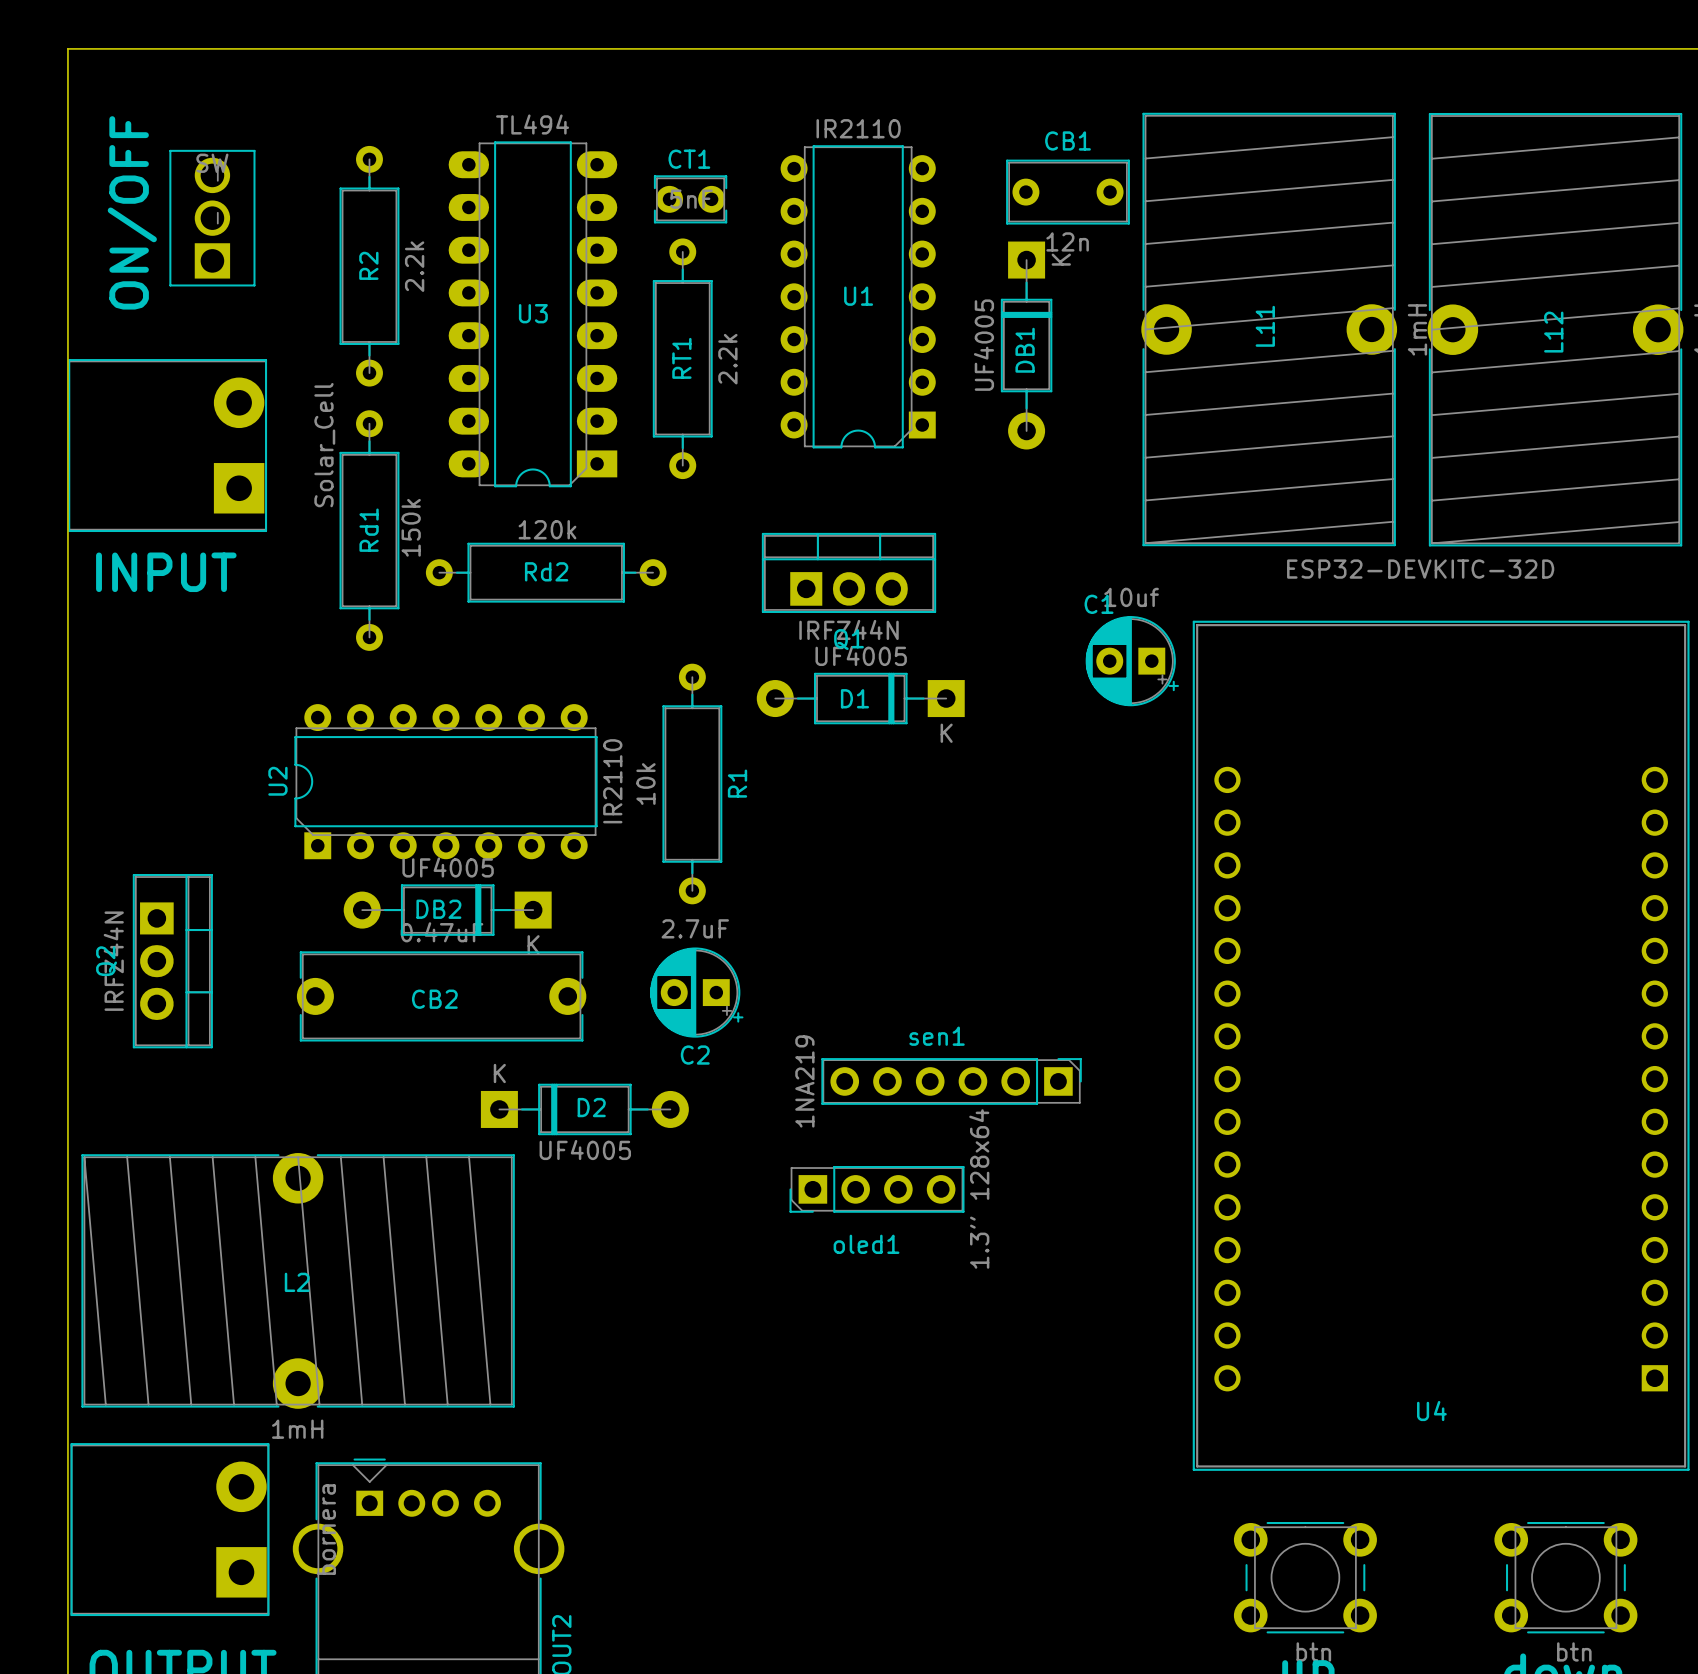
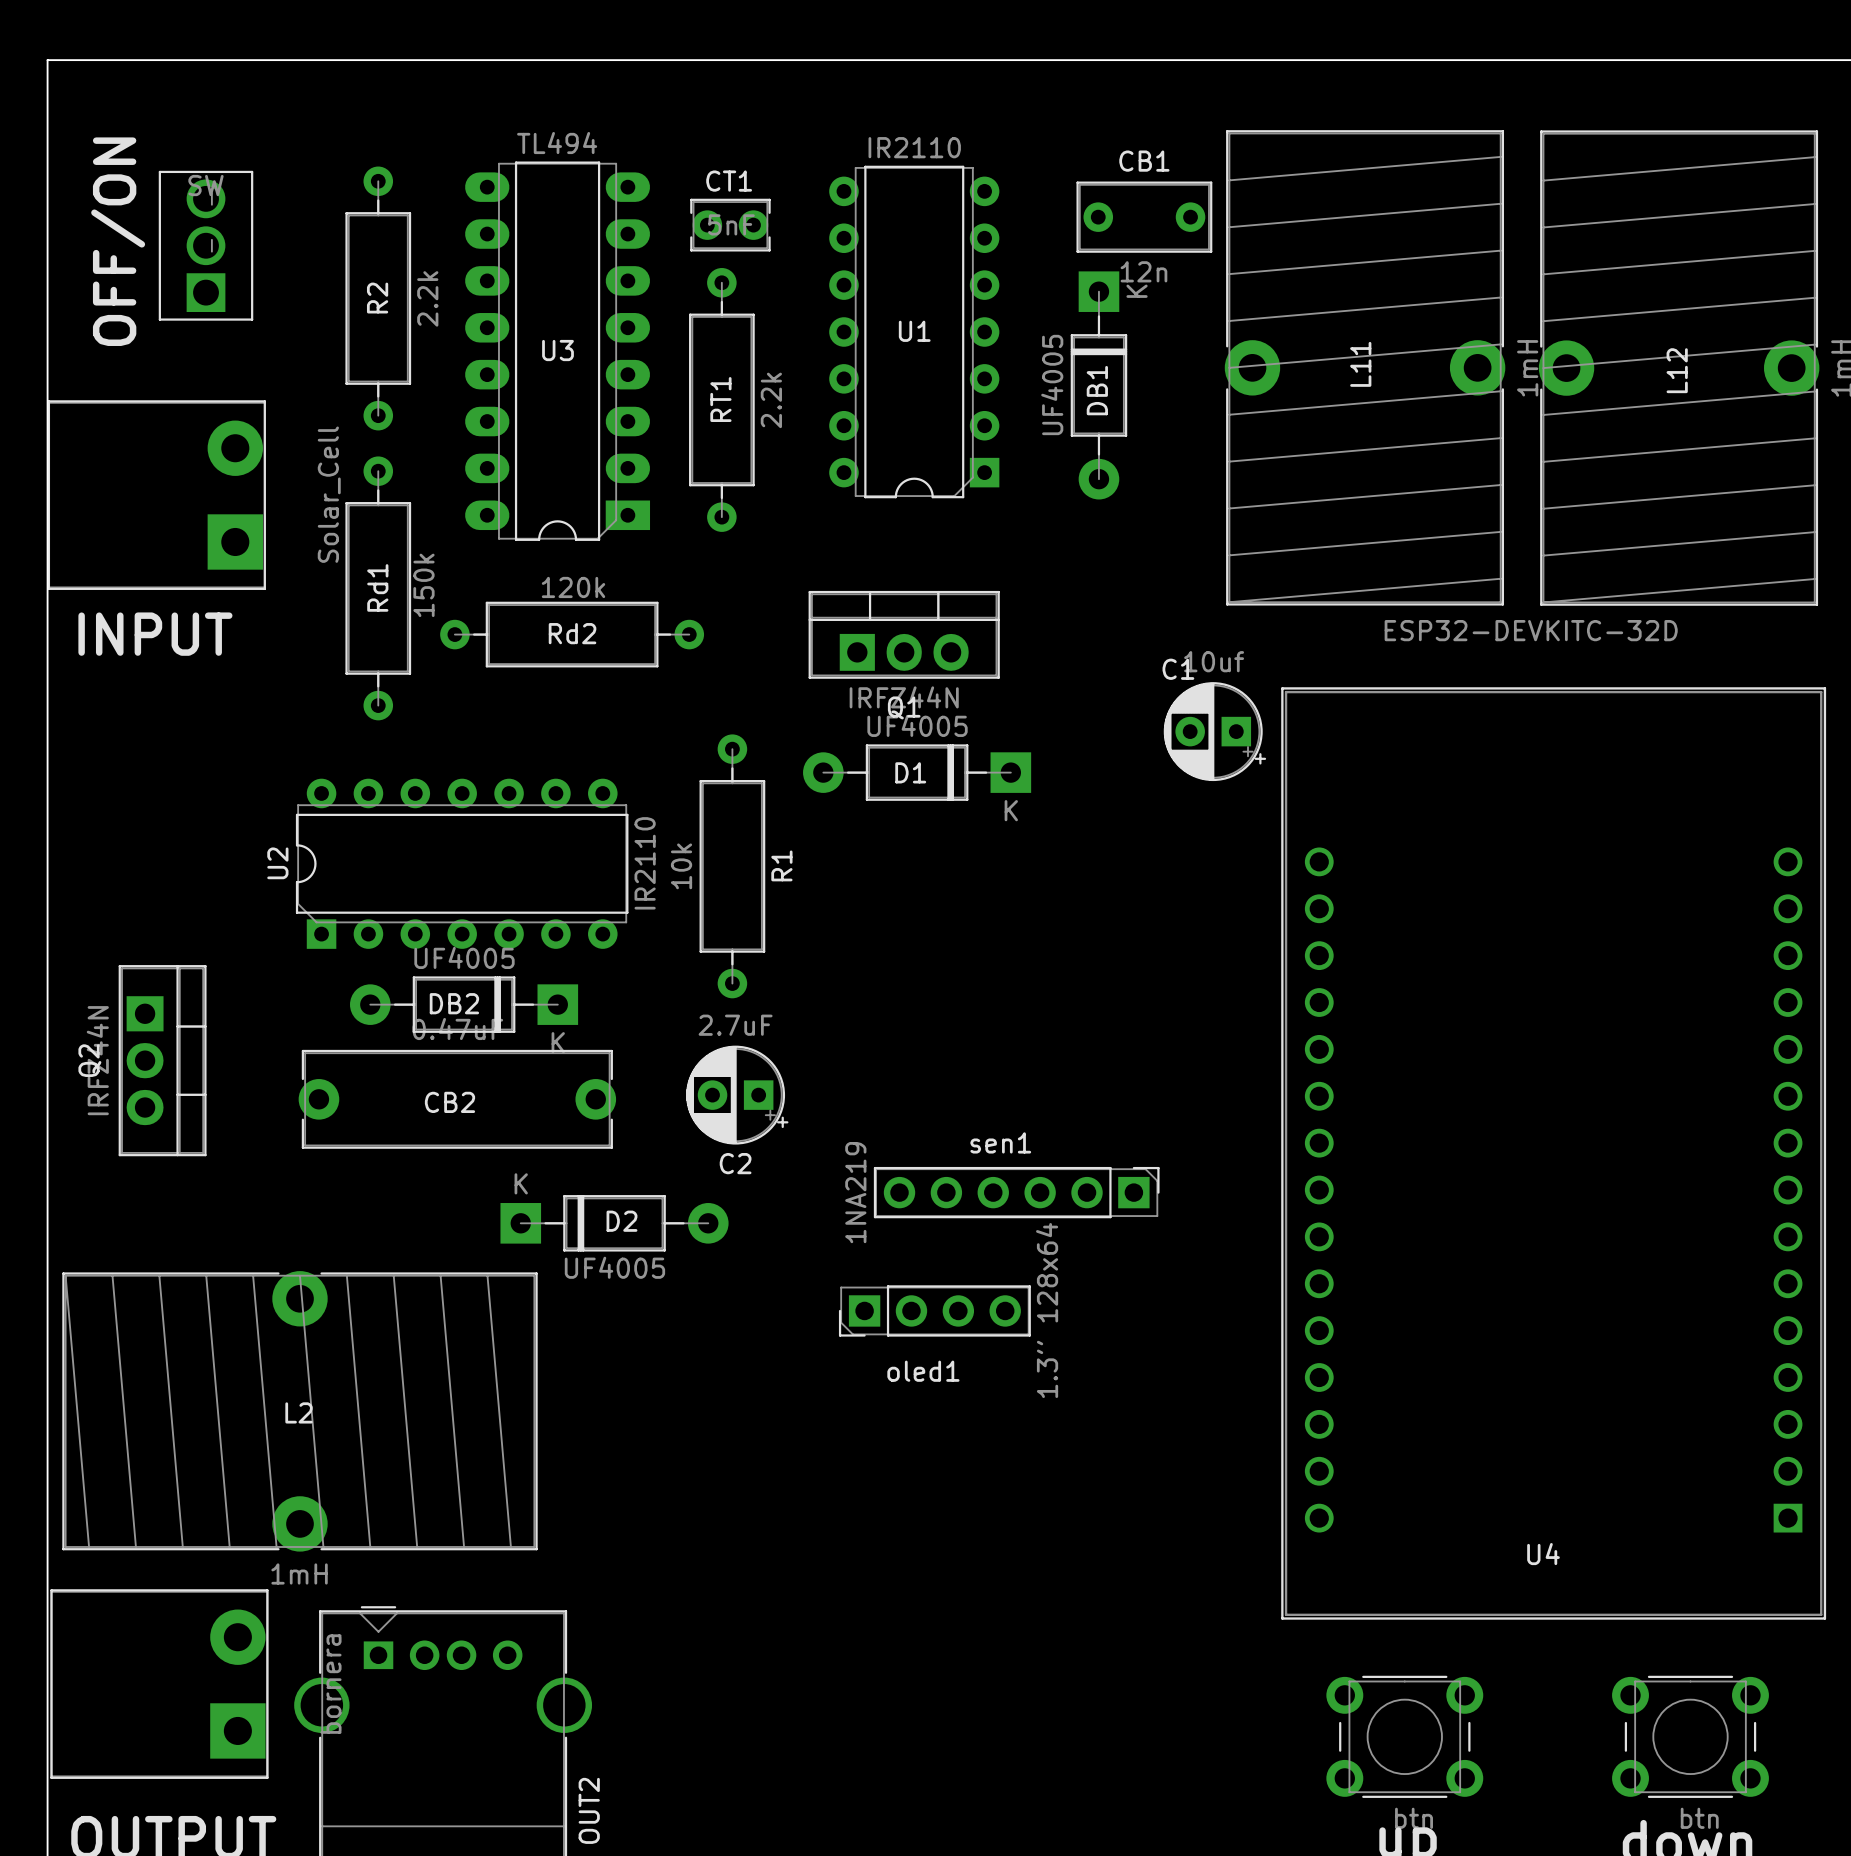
ON/OFF name: ON/OFF (132, 212) -> OFF/ON (118, 241)

